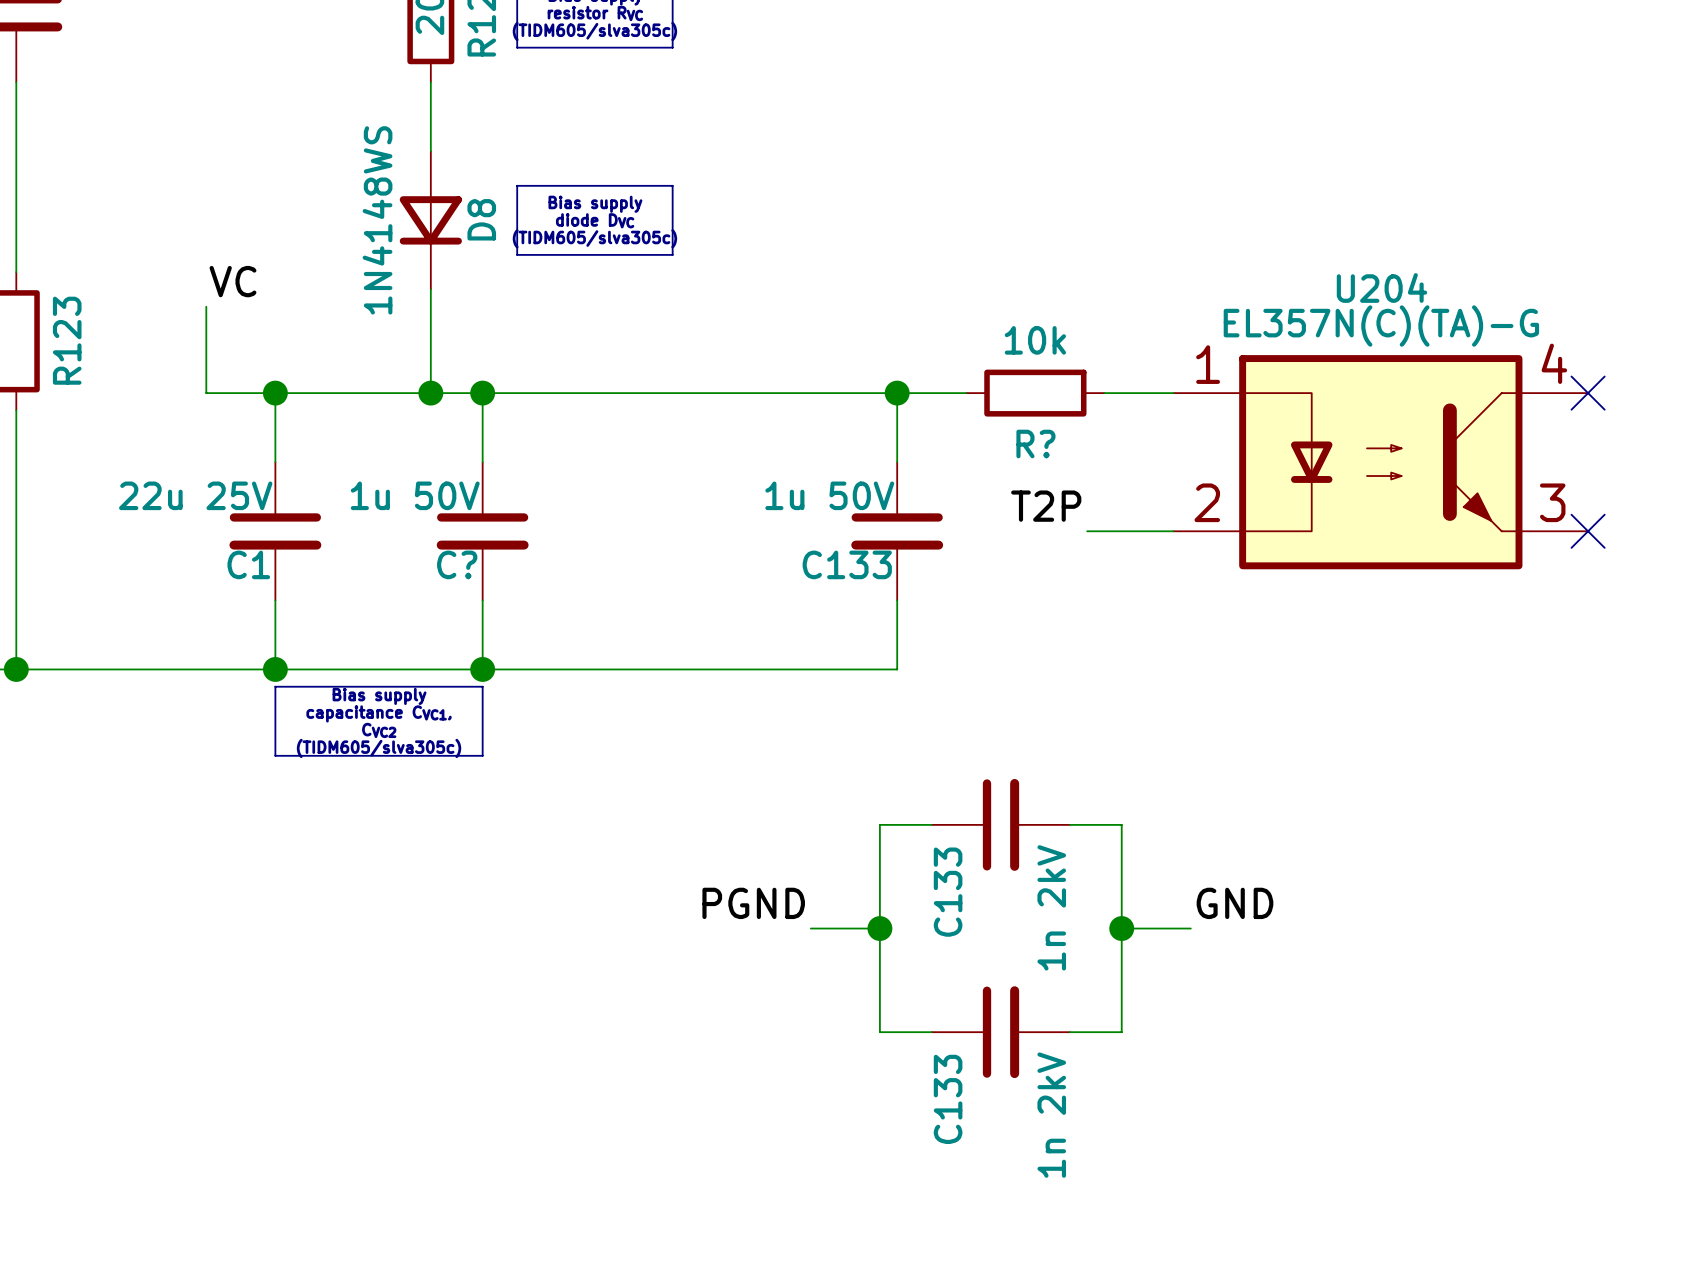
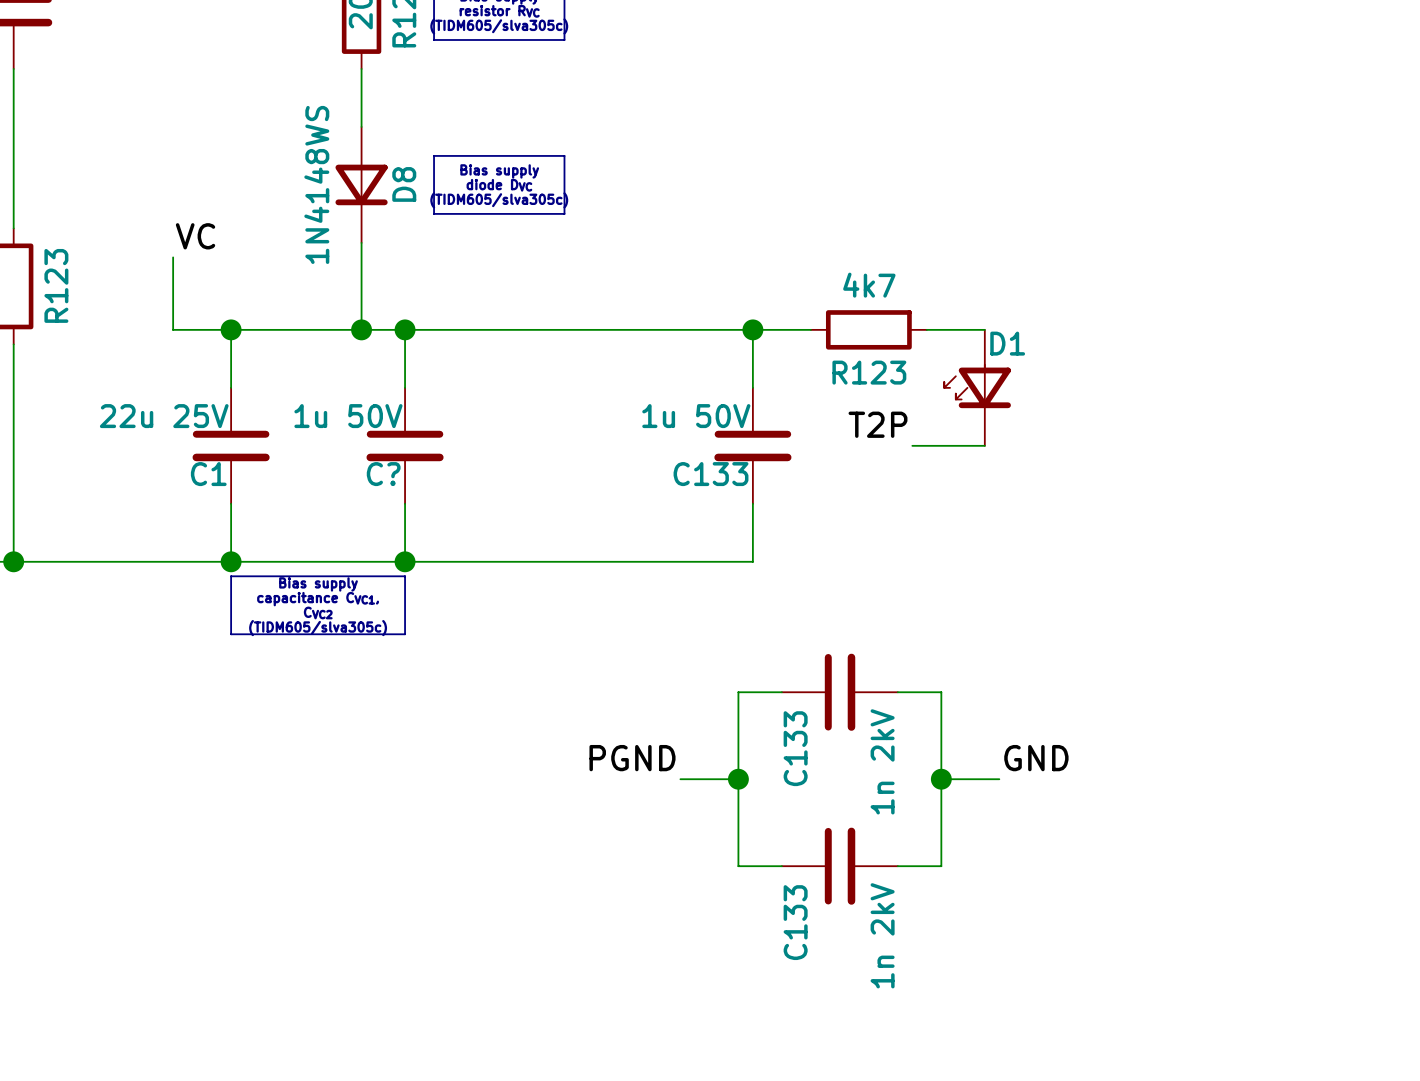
R? value: 10k (1035, 340) -> 4k7 (869, 285)
no-connect mark: (1588, 393) -> none
R? name: R? (1035, 444) -> R123 (869, 372)
D1: none -> (977, 387)
U204: EL357N(C)(TA)-G (1380, 462) -> none
no-connect mark: (1588, 531) -> none

